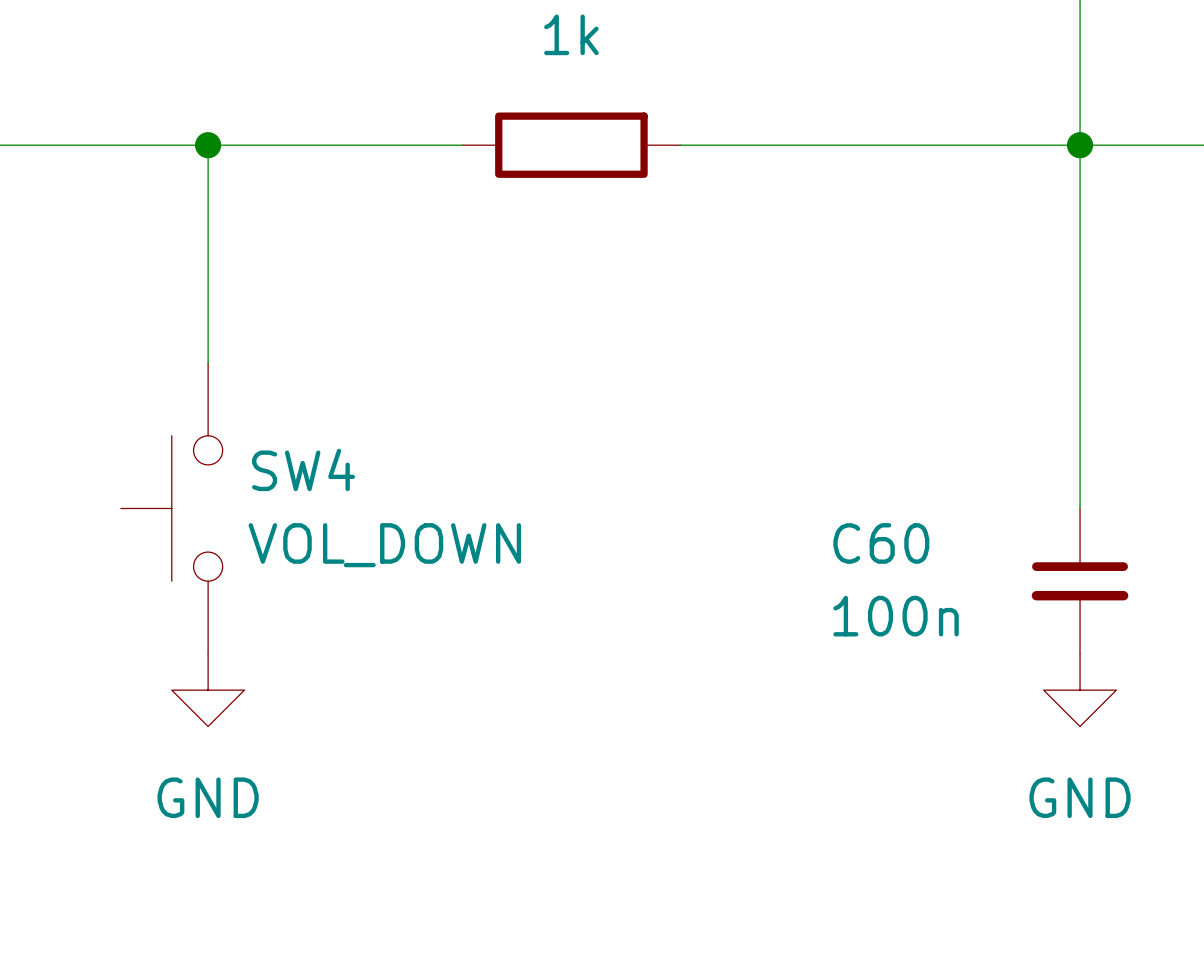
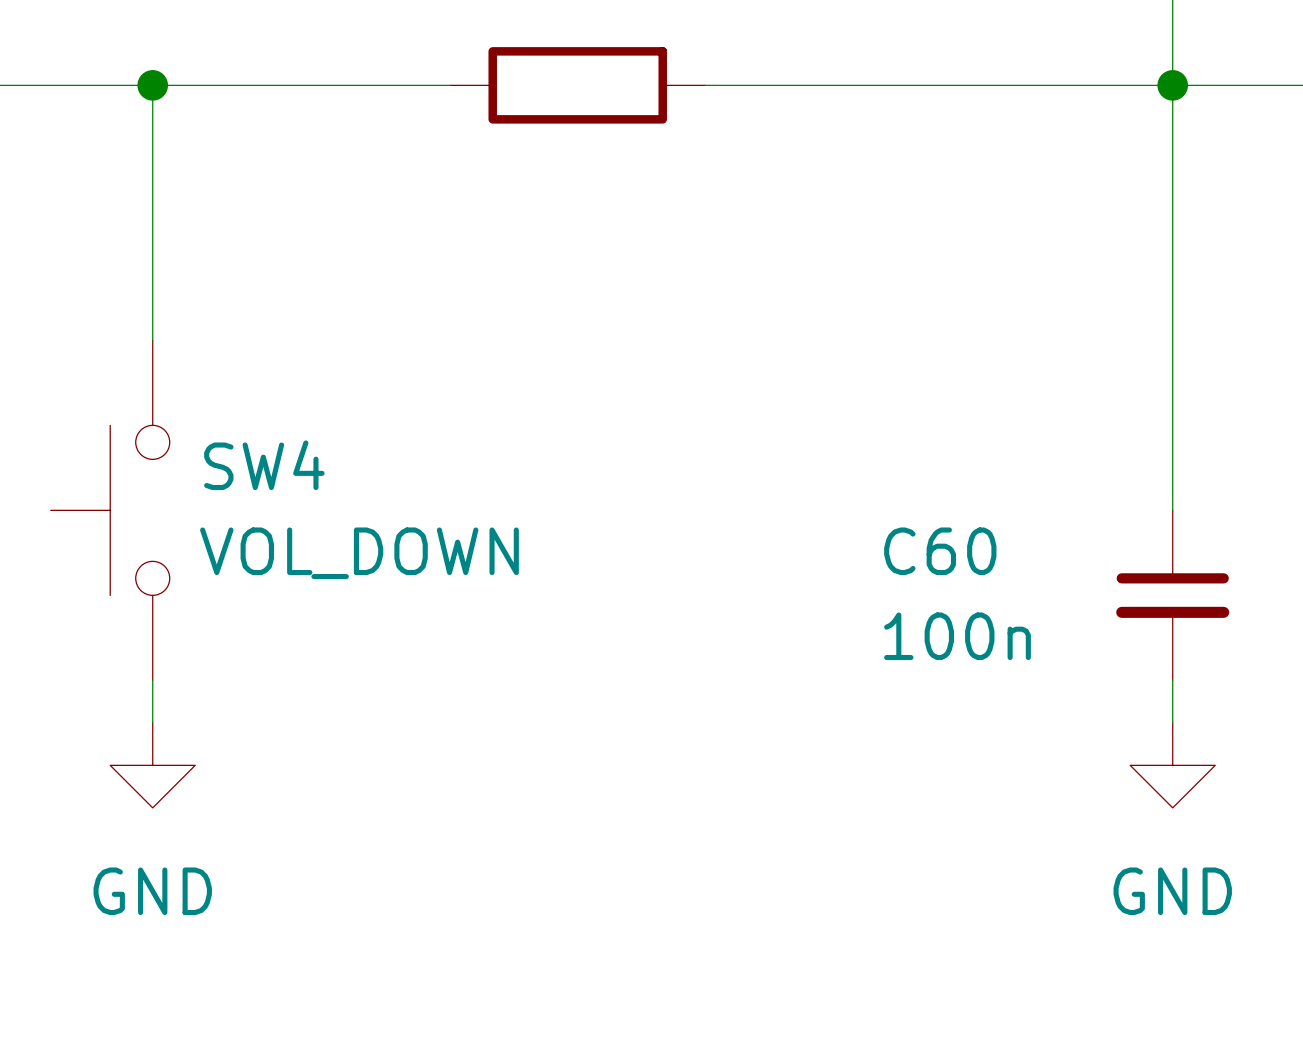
power symbol position: GND (208, 690) -> GND (152, 765)
power symbol position: GND (1080, 690) -> GND (1172, 765)

